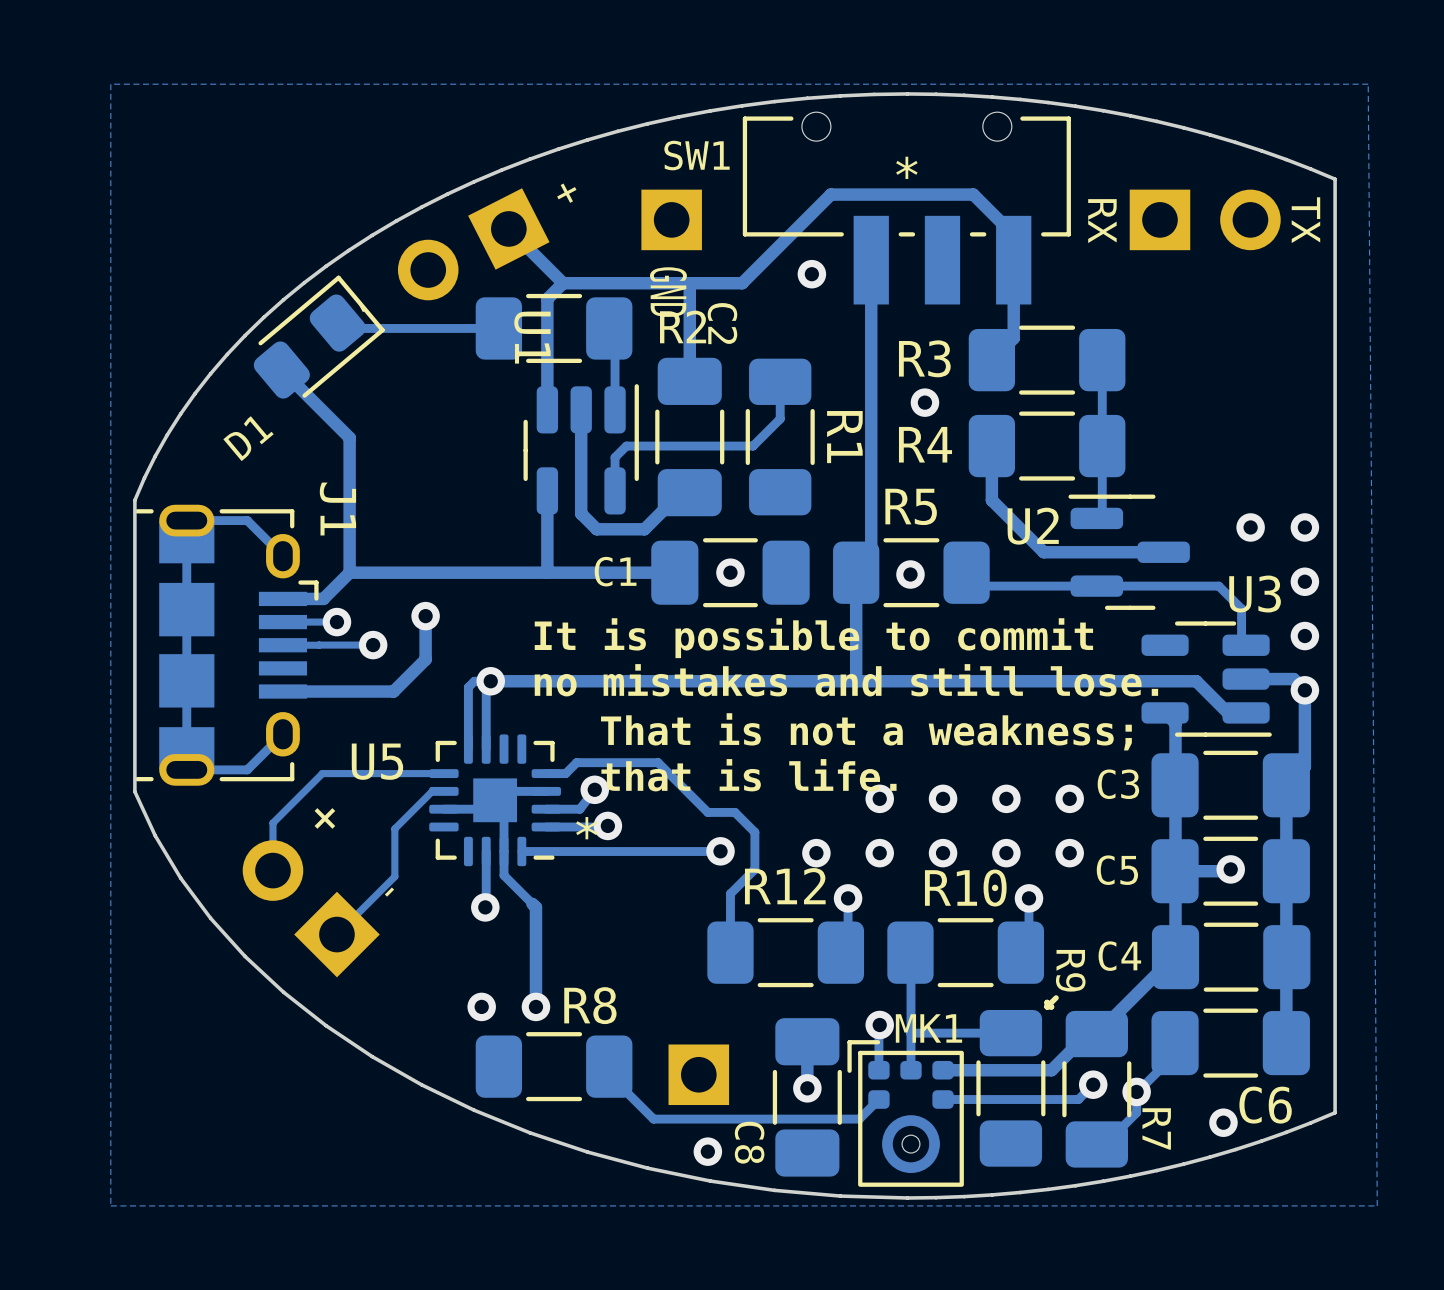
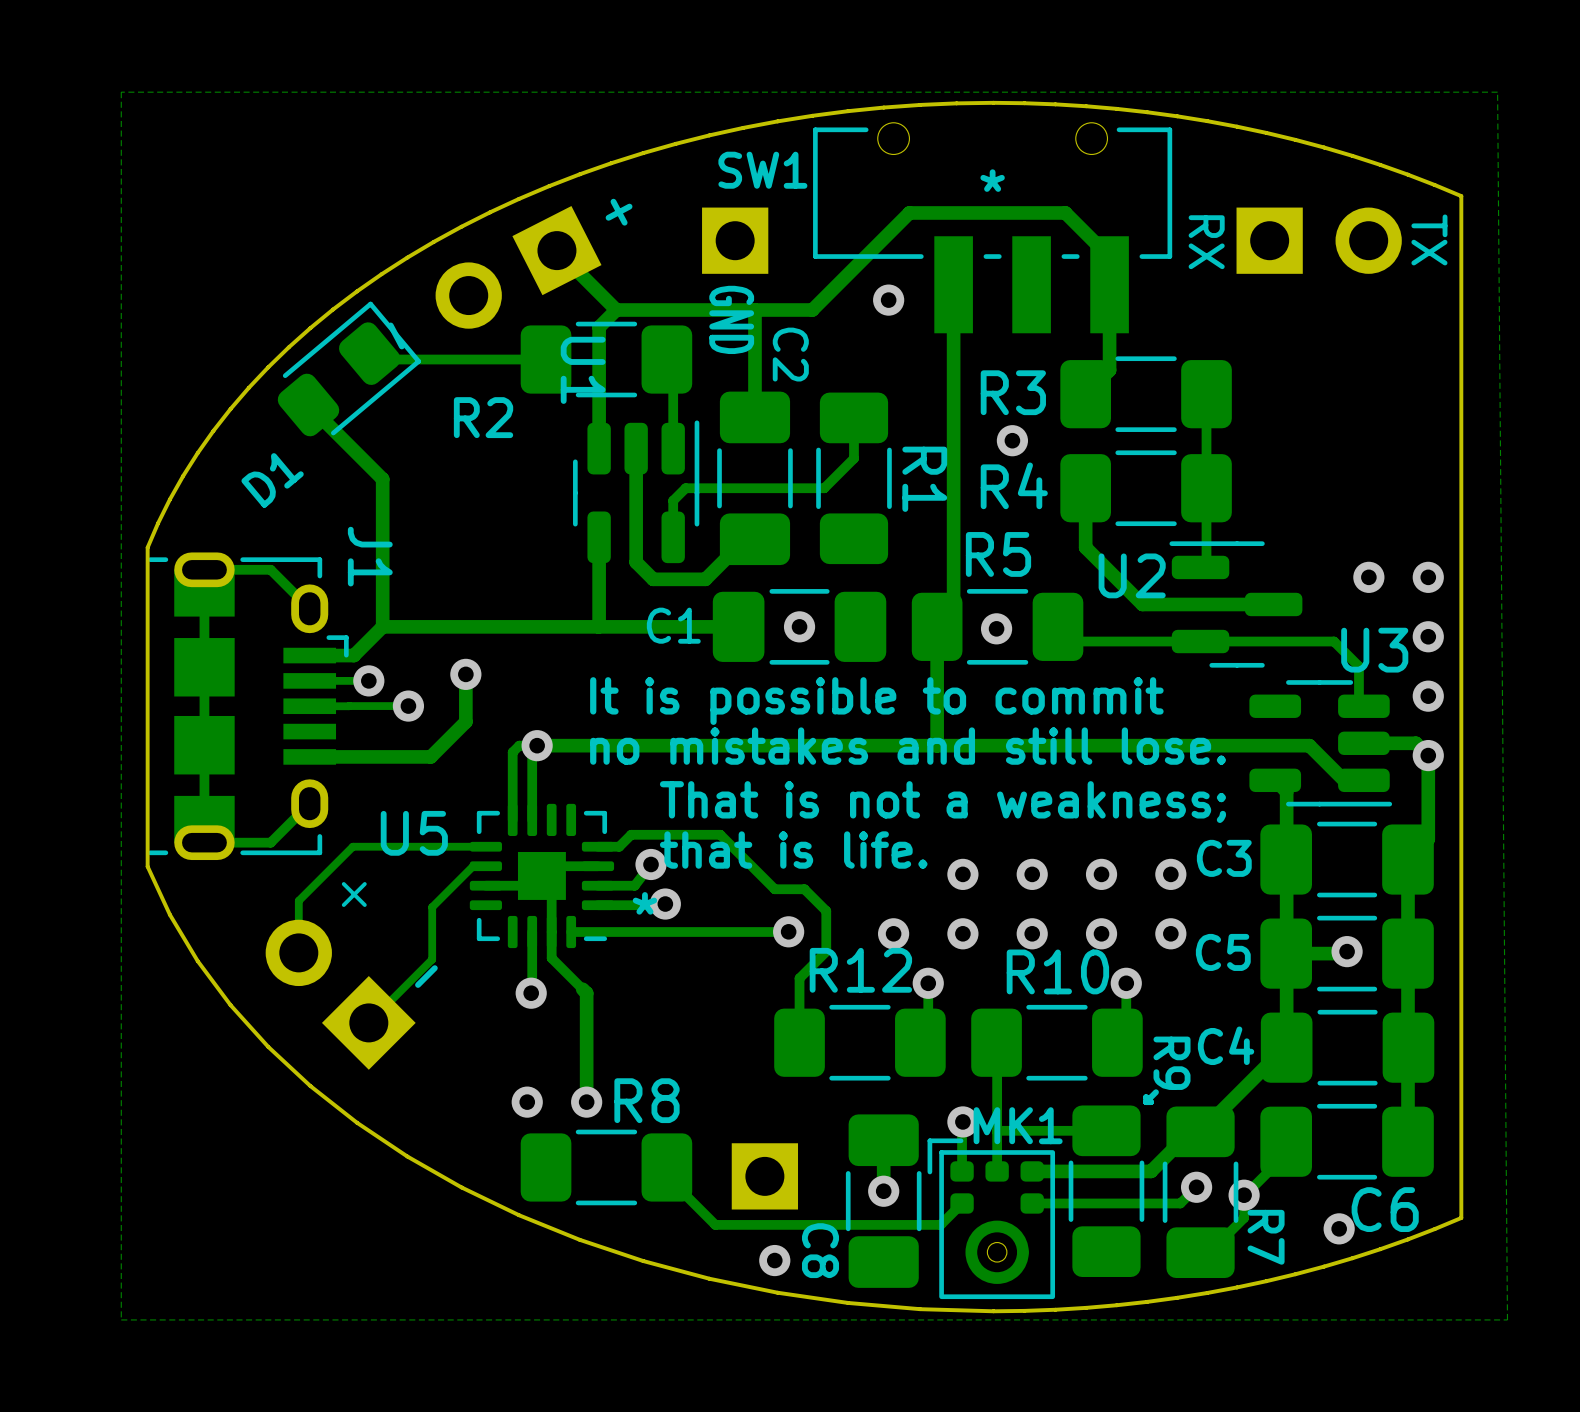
R2 name position: R2 (683, 326) -> R2 (483, 417)

